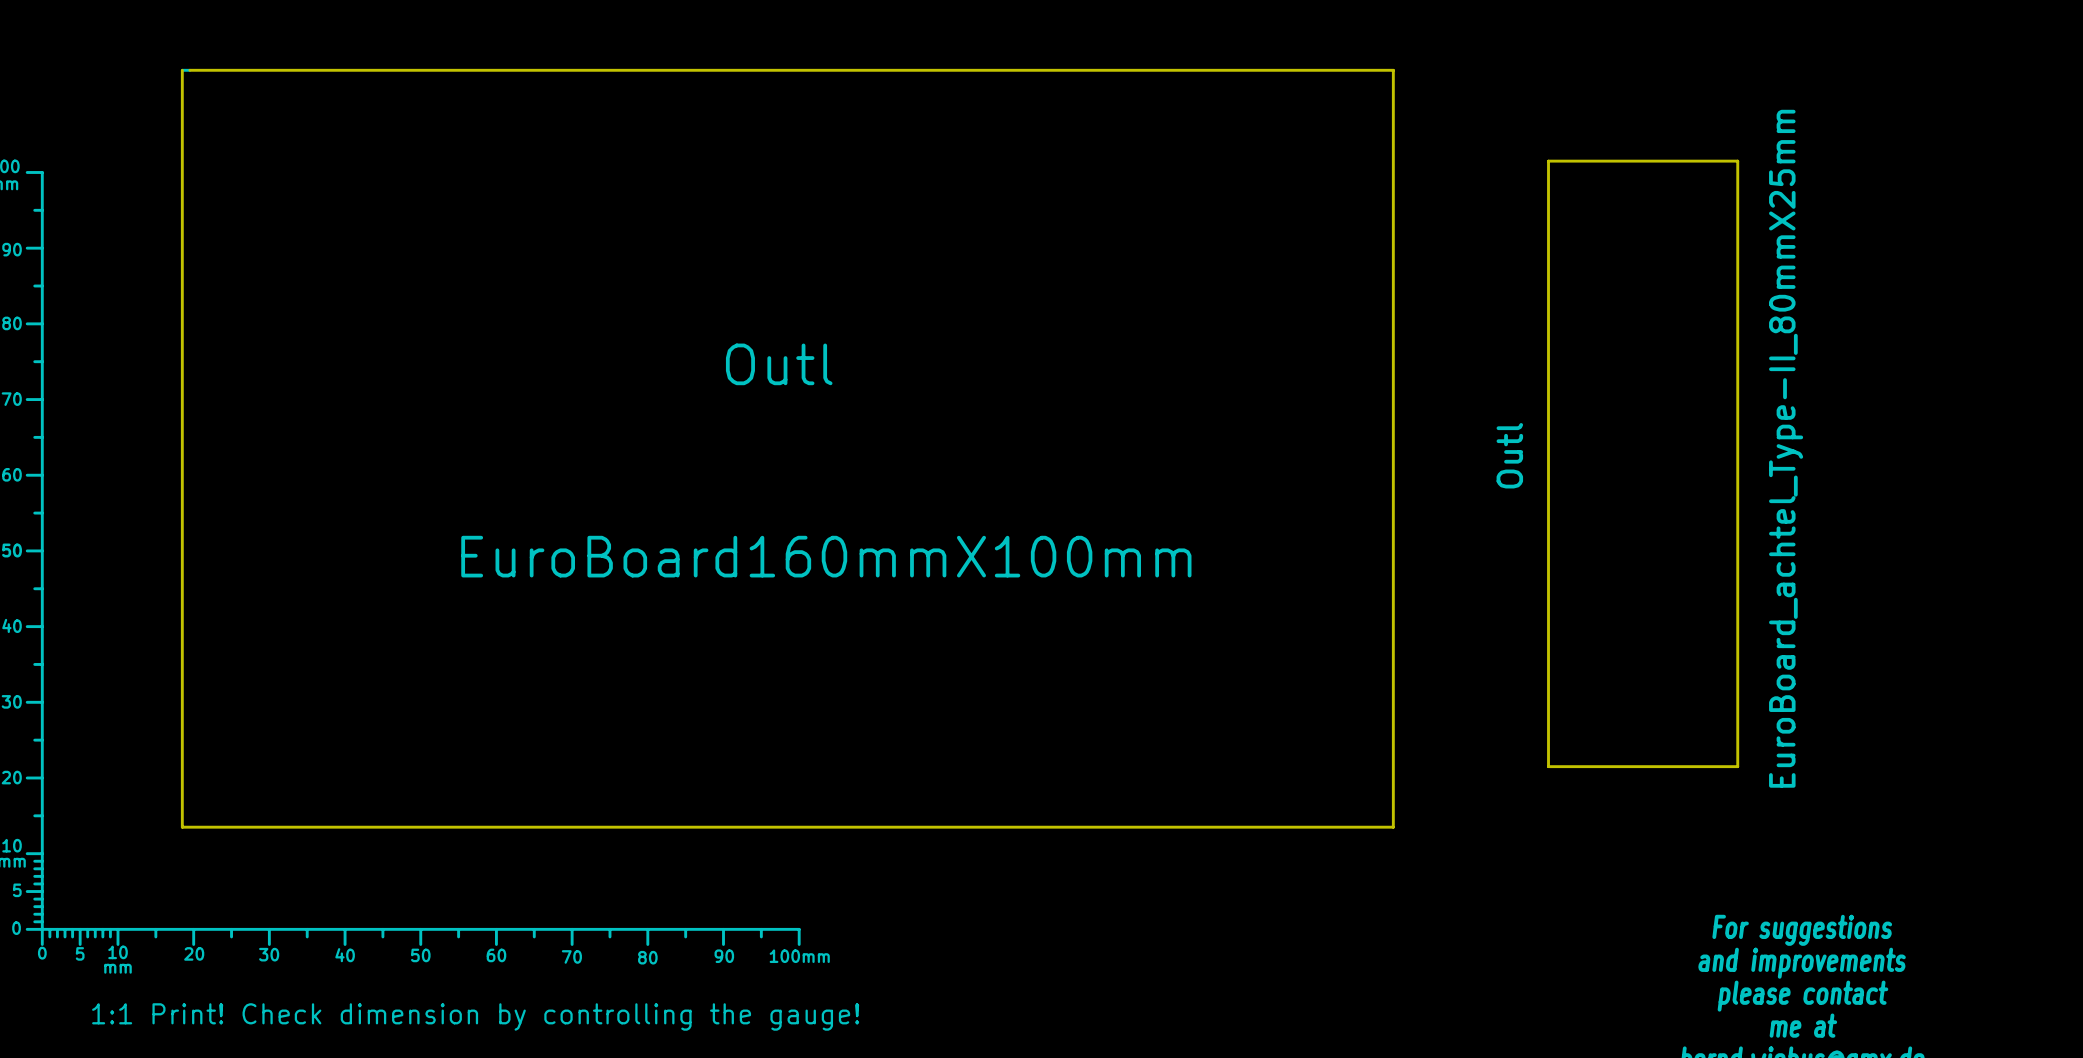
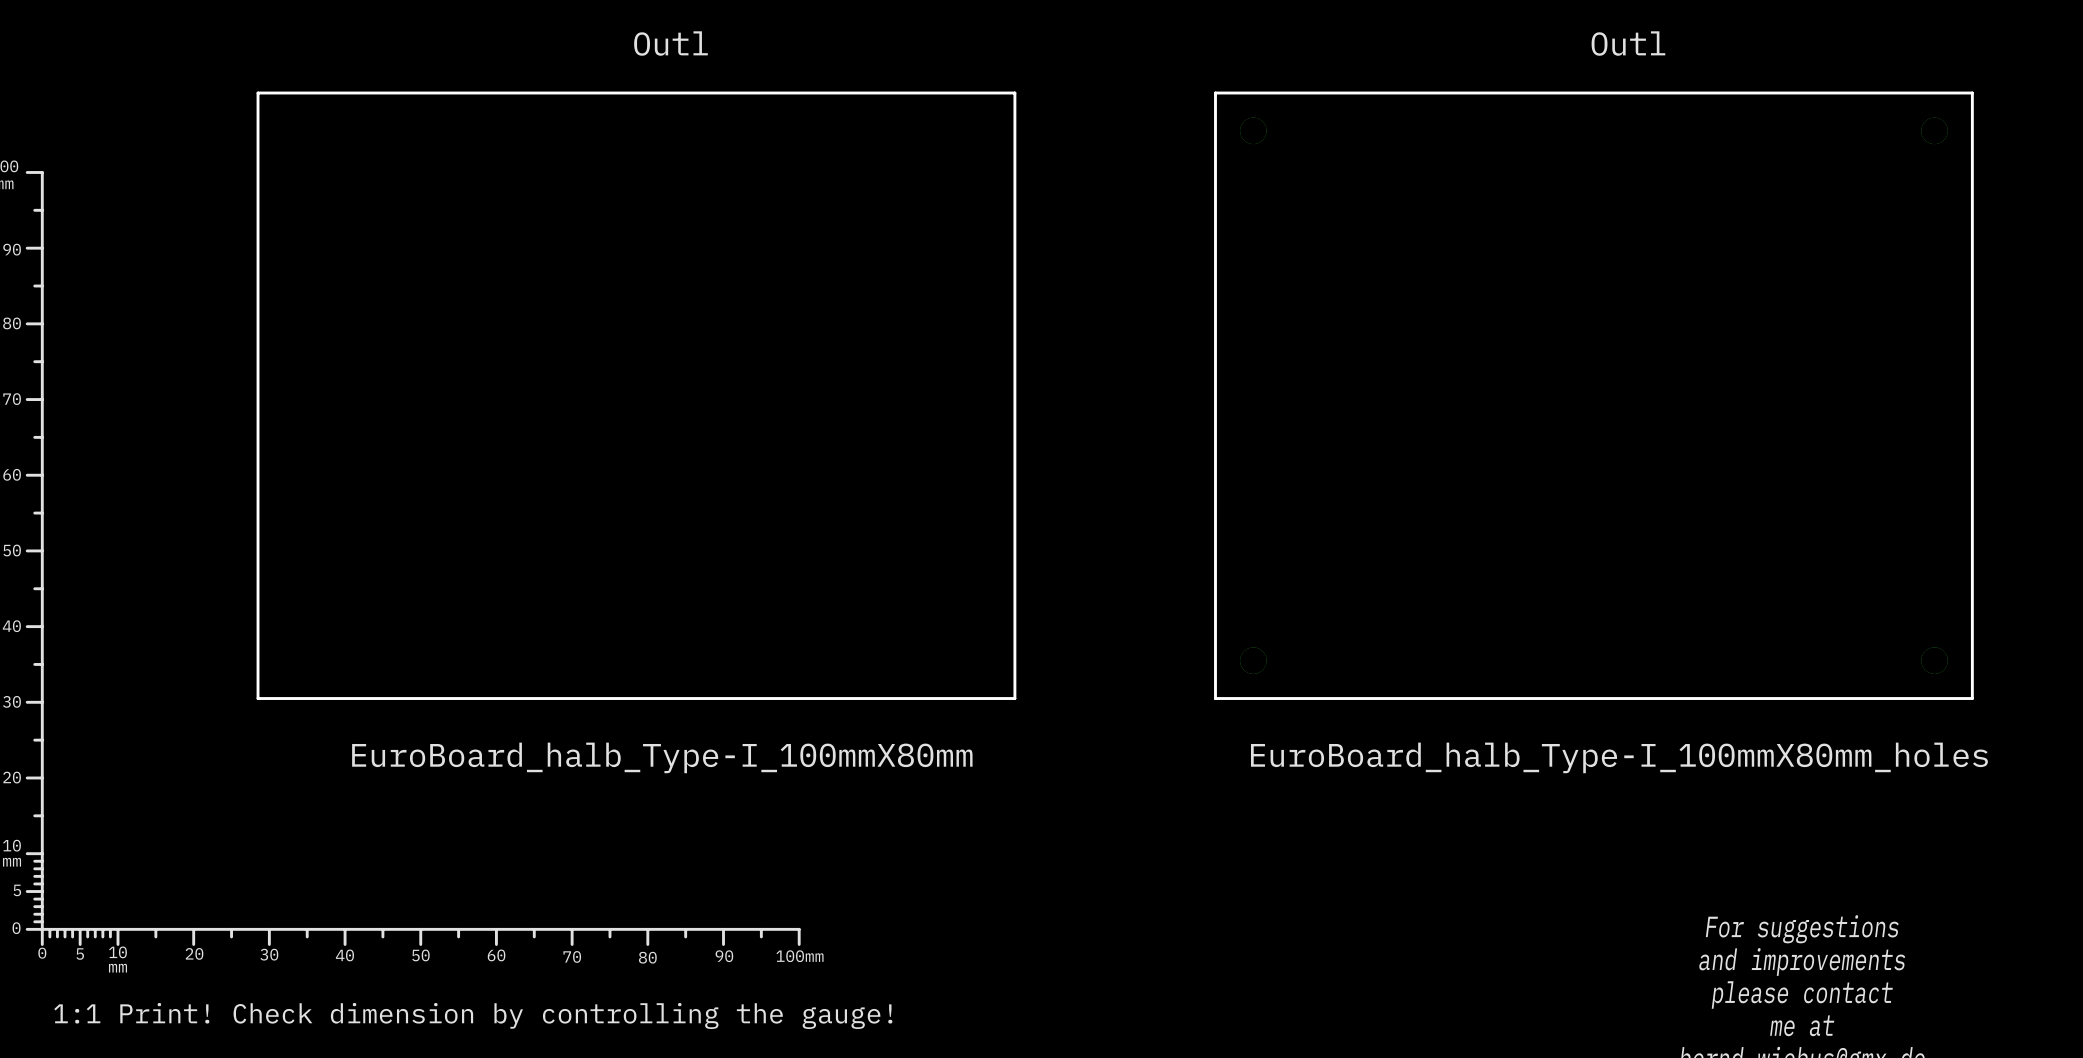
Outl: none -> EuroBoard_halb_Type-I_100mmX80mm (636, 395)
Outl: none -> EuroBoard_halb_Type-I_100mmX80mm_holes (1593, 395)
Outl: EuroBoard160mmX100mm (787, 448) -> none
Outl: EuroBoard_achtel_Type-II_80mmX25mm (1643, 463) -> none

